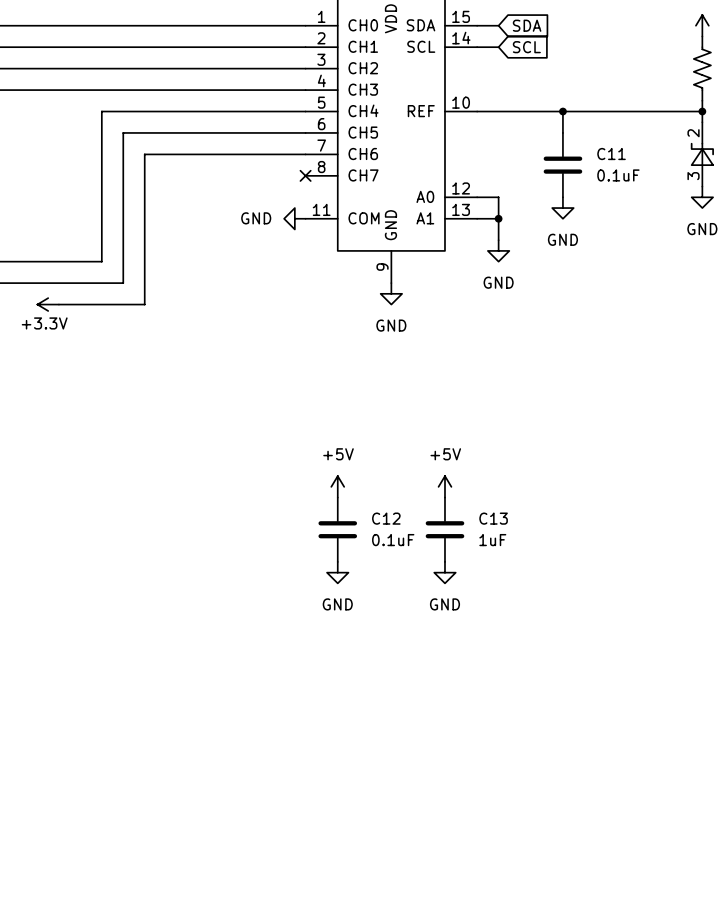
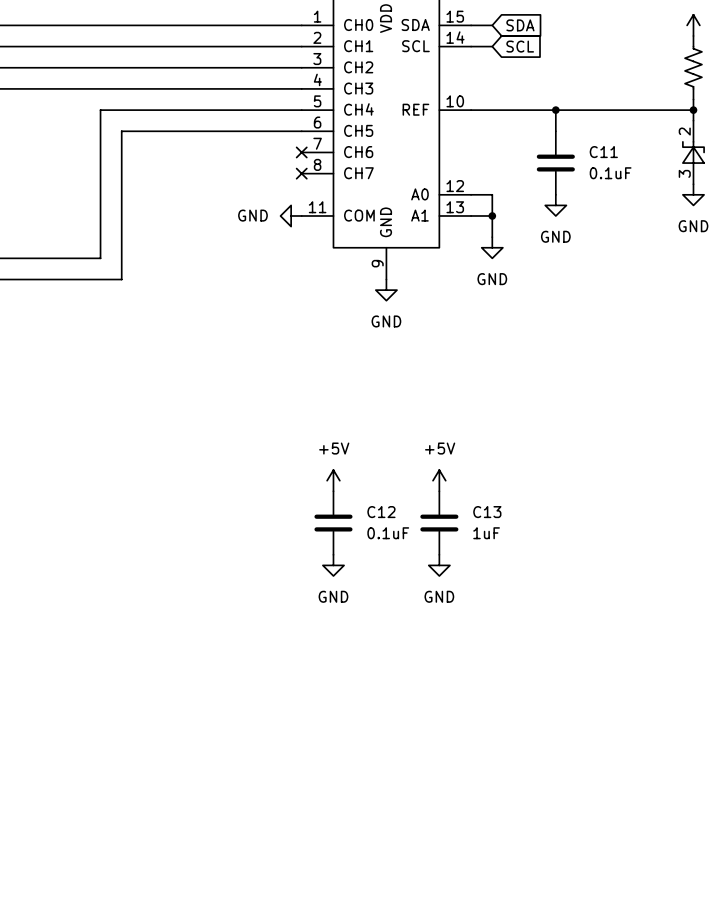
wire: (305, 154) (144, 154) (144, 304) (58, 304) -> none
no-connect mark: none -> (301, 152)
power symbol: +3.3V (48, 304) -> none

